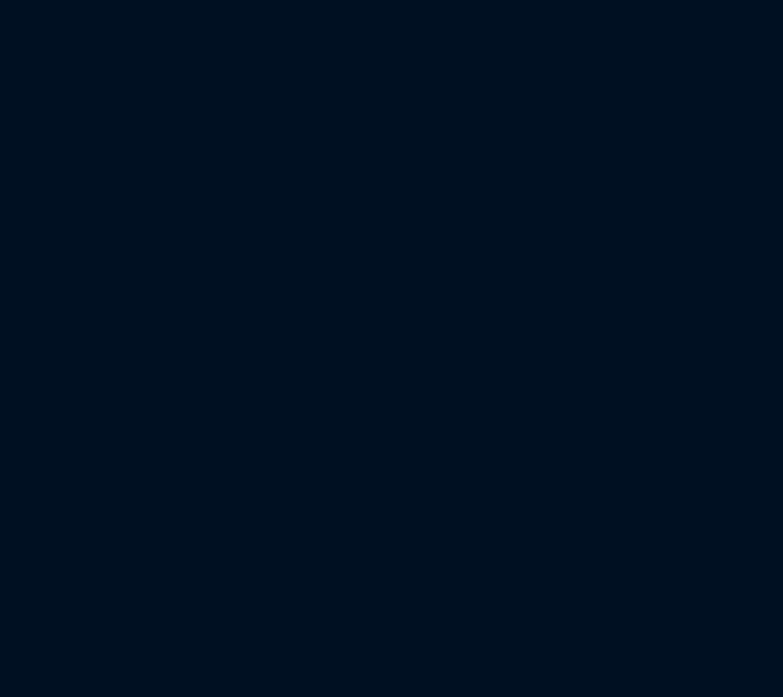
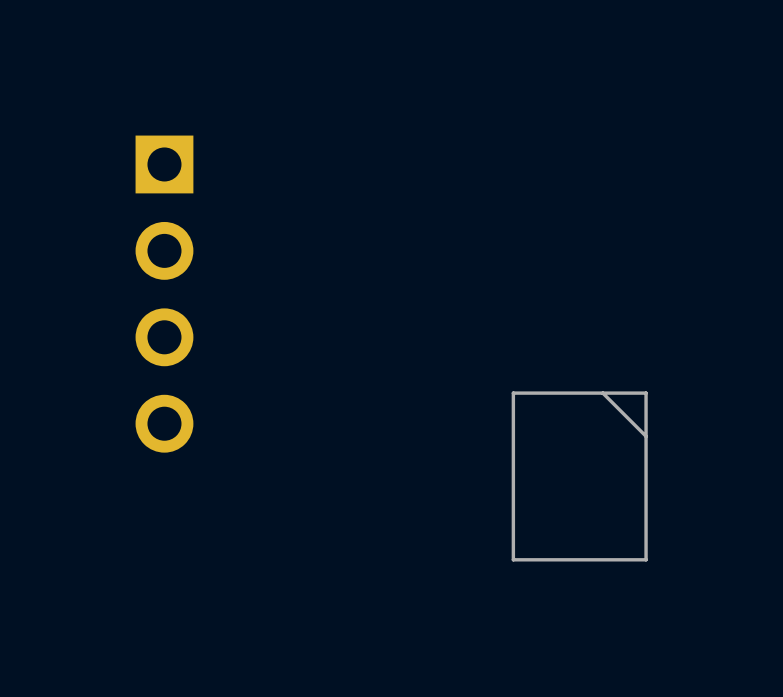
part: none -> (164, 294)
part: none -> (579, 476)

